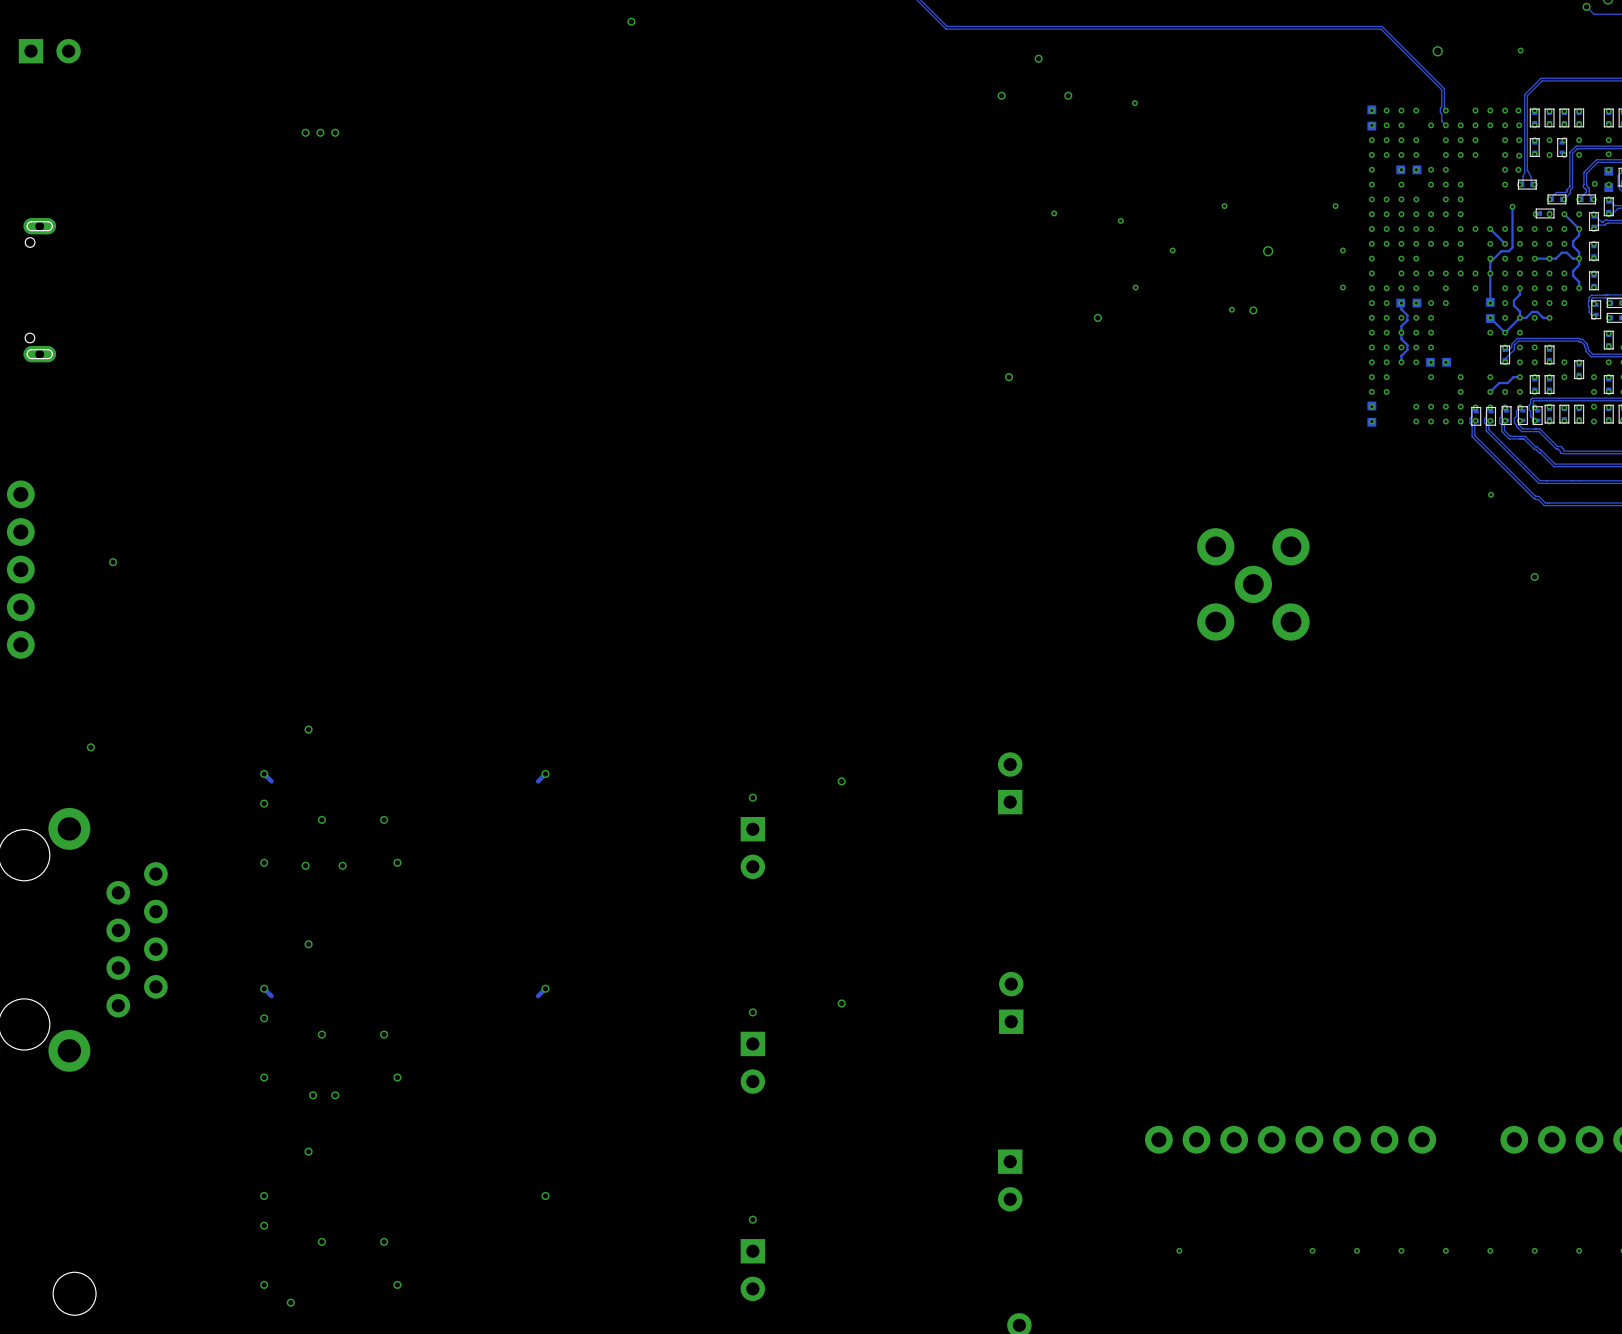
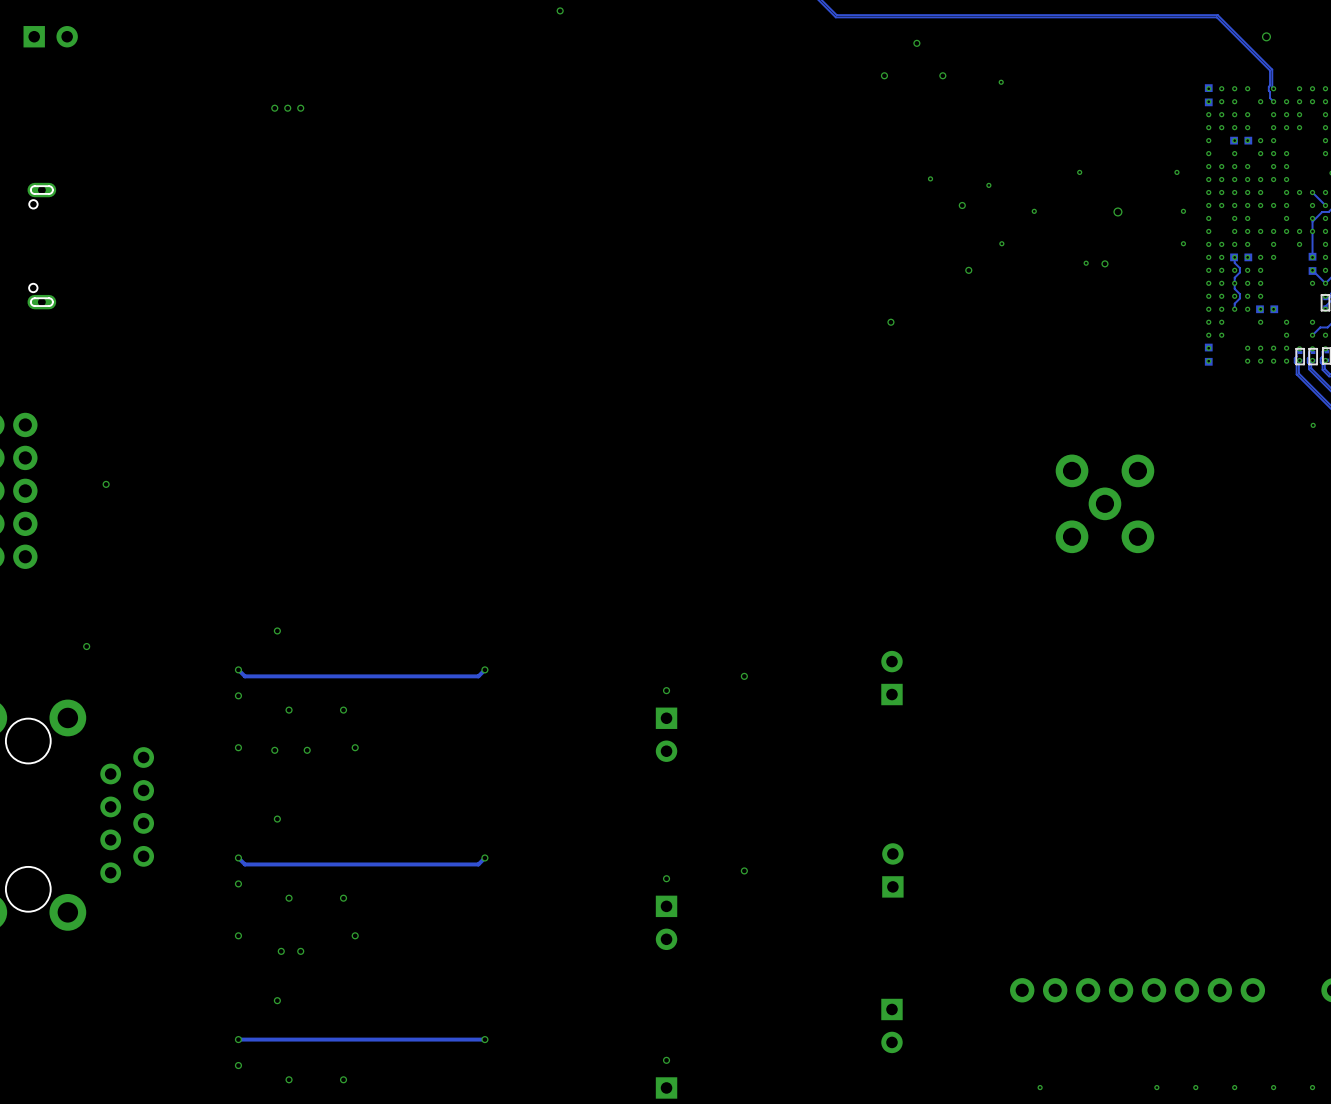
via: none -> (962, 205)
track: none -> (478, 676) (244, 676)
track: none -> (478, 864) (244, 864)
track: none -> (484, 1039) (238, 1039)

